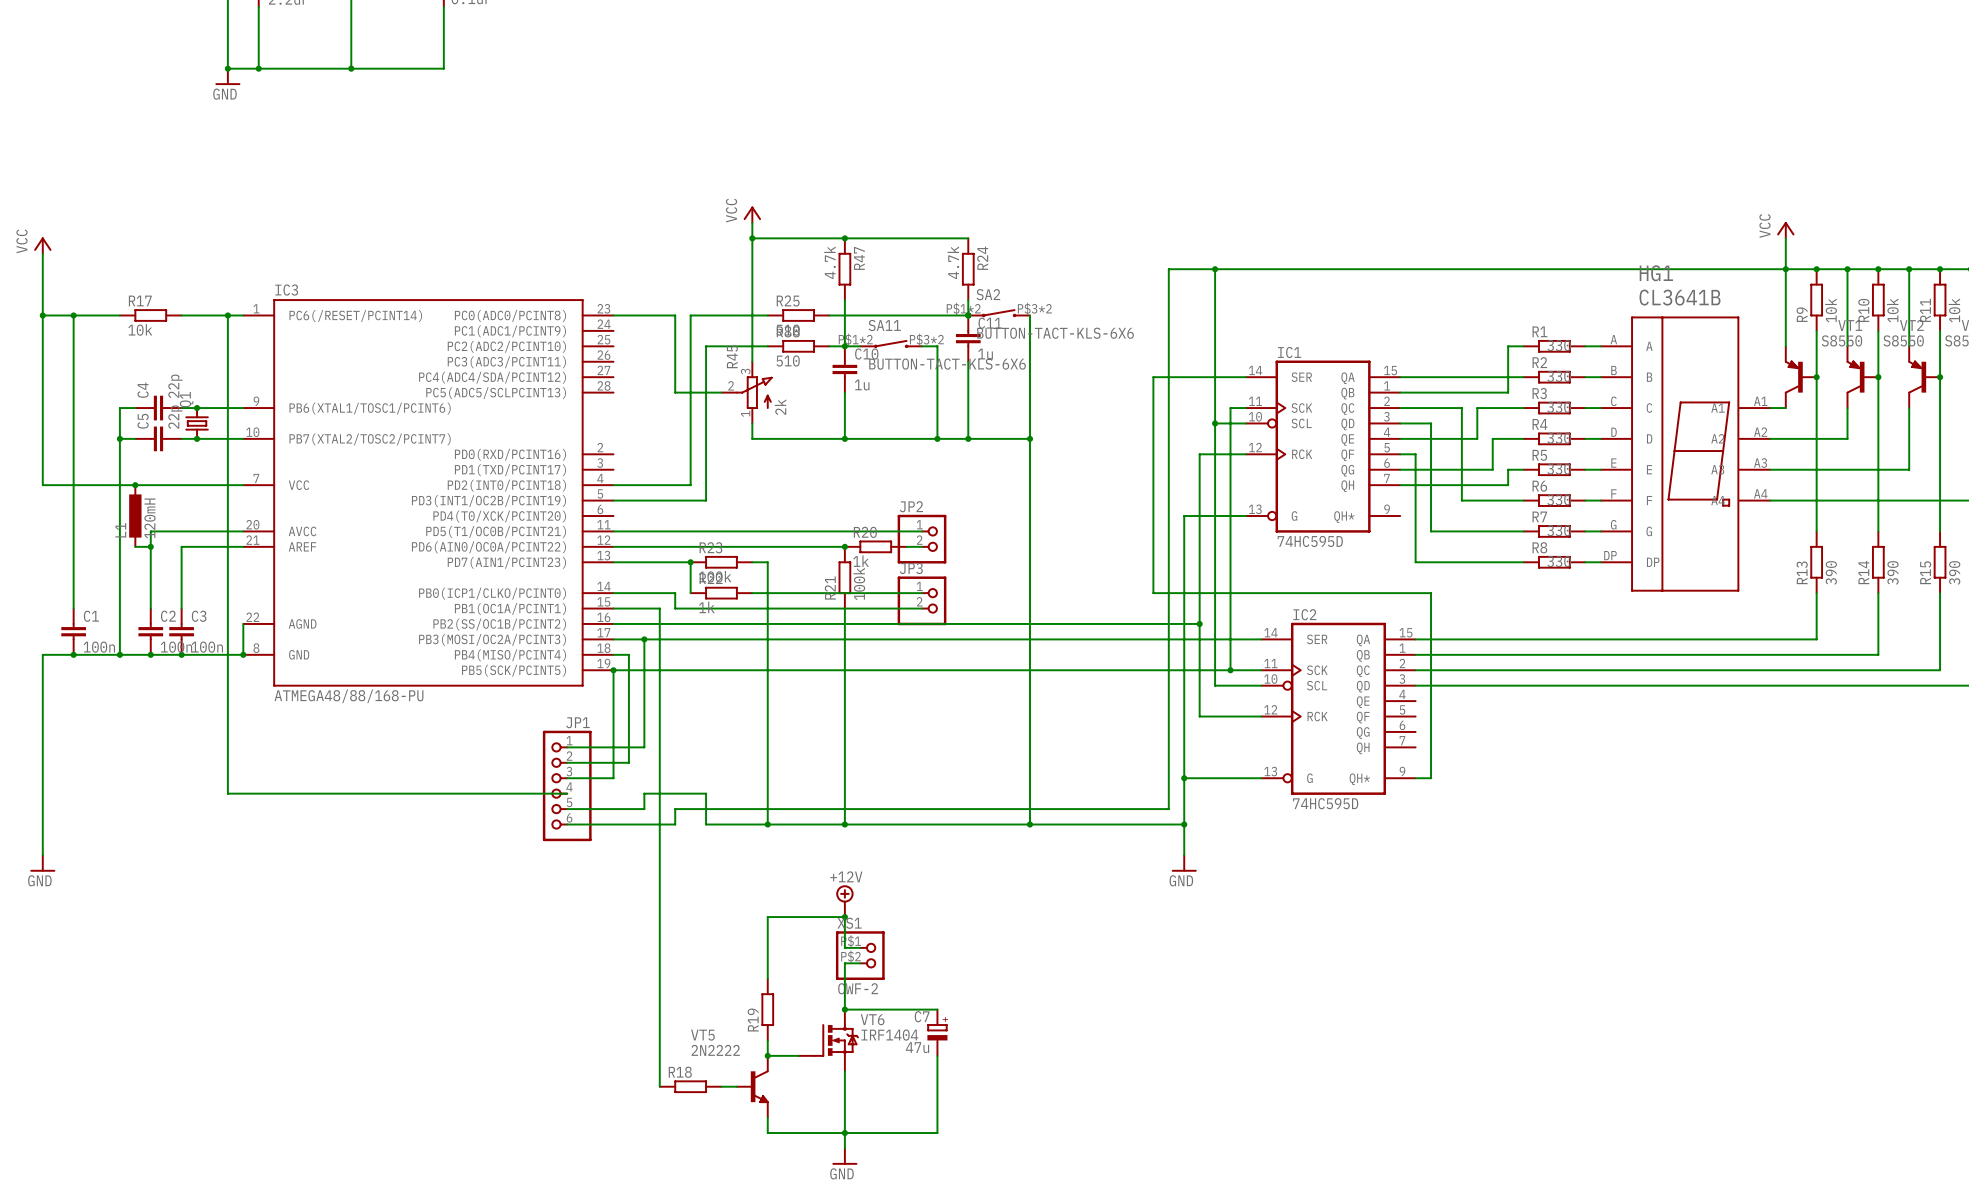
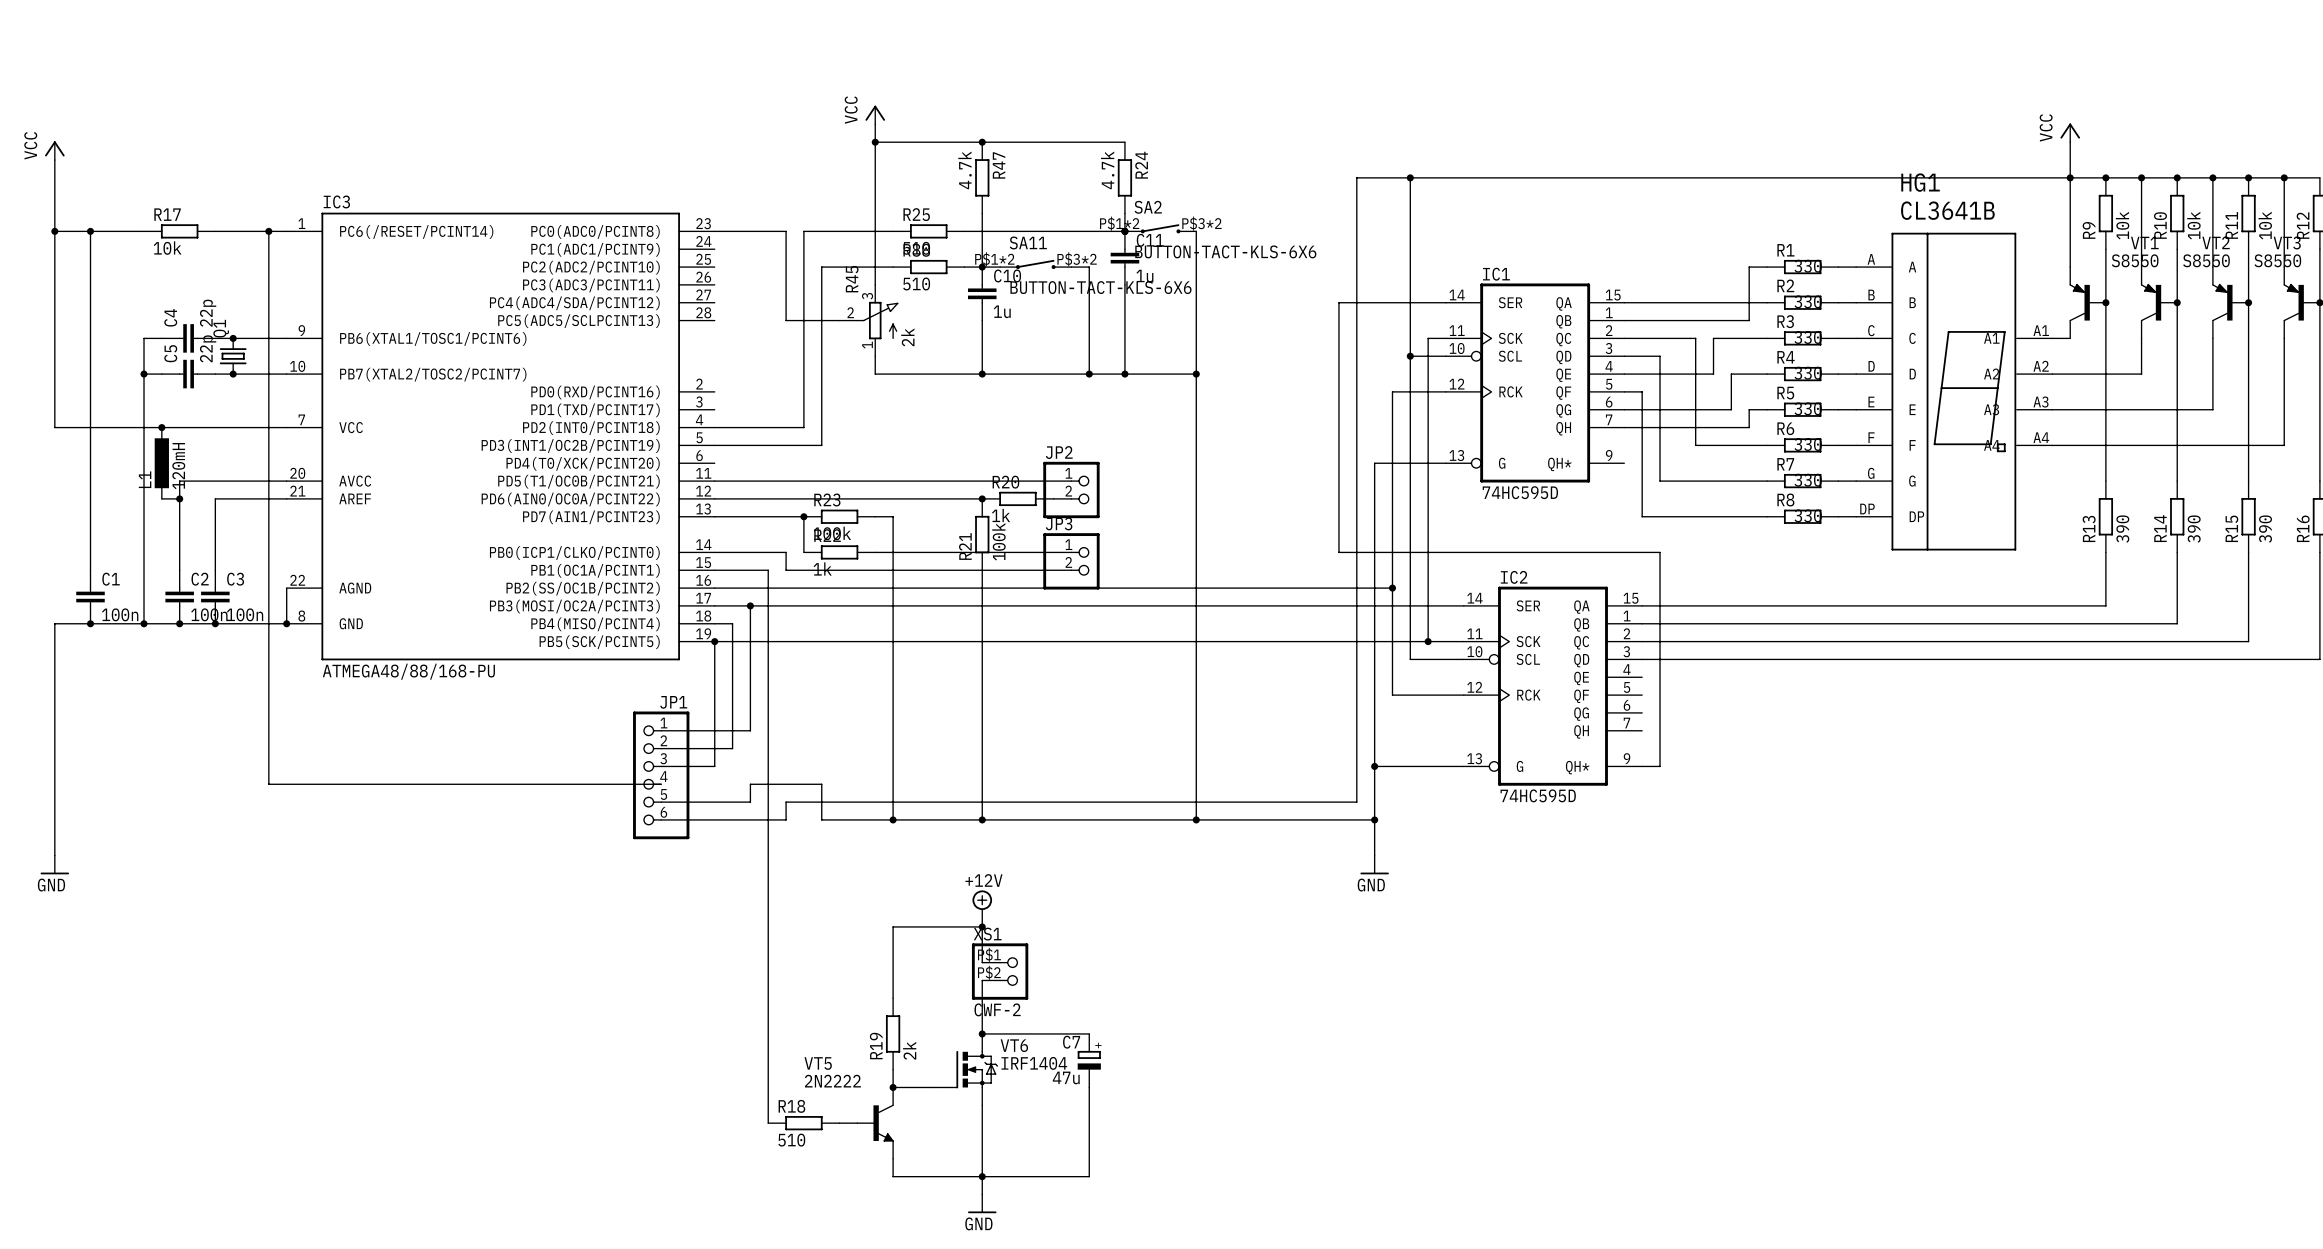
R19 value: none -> 2k (909, 1050)
R18 value: none -> 510 (791, 1140)

